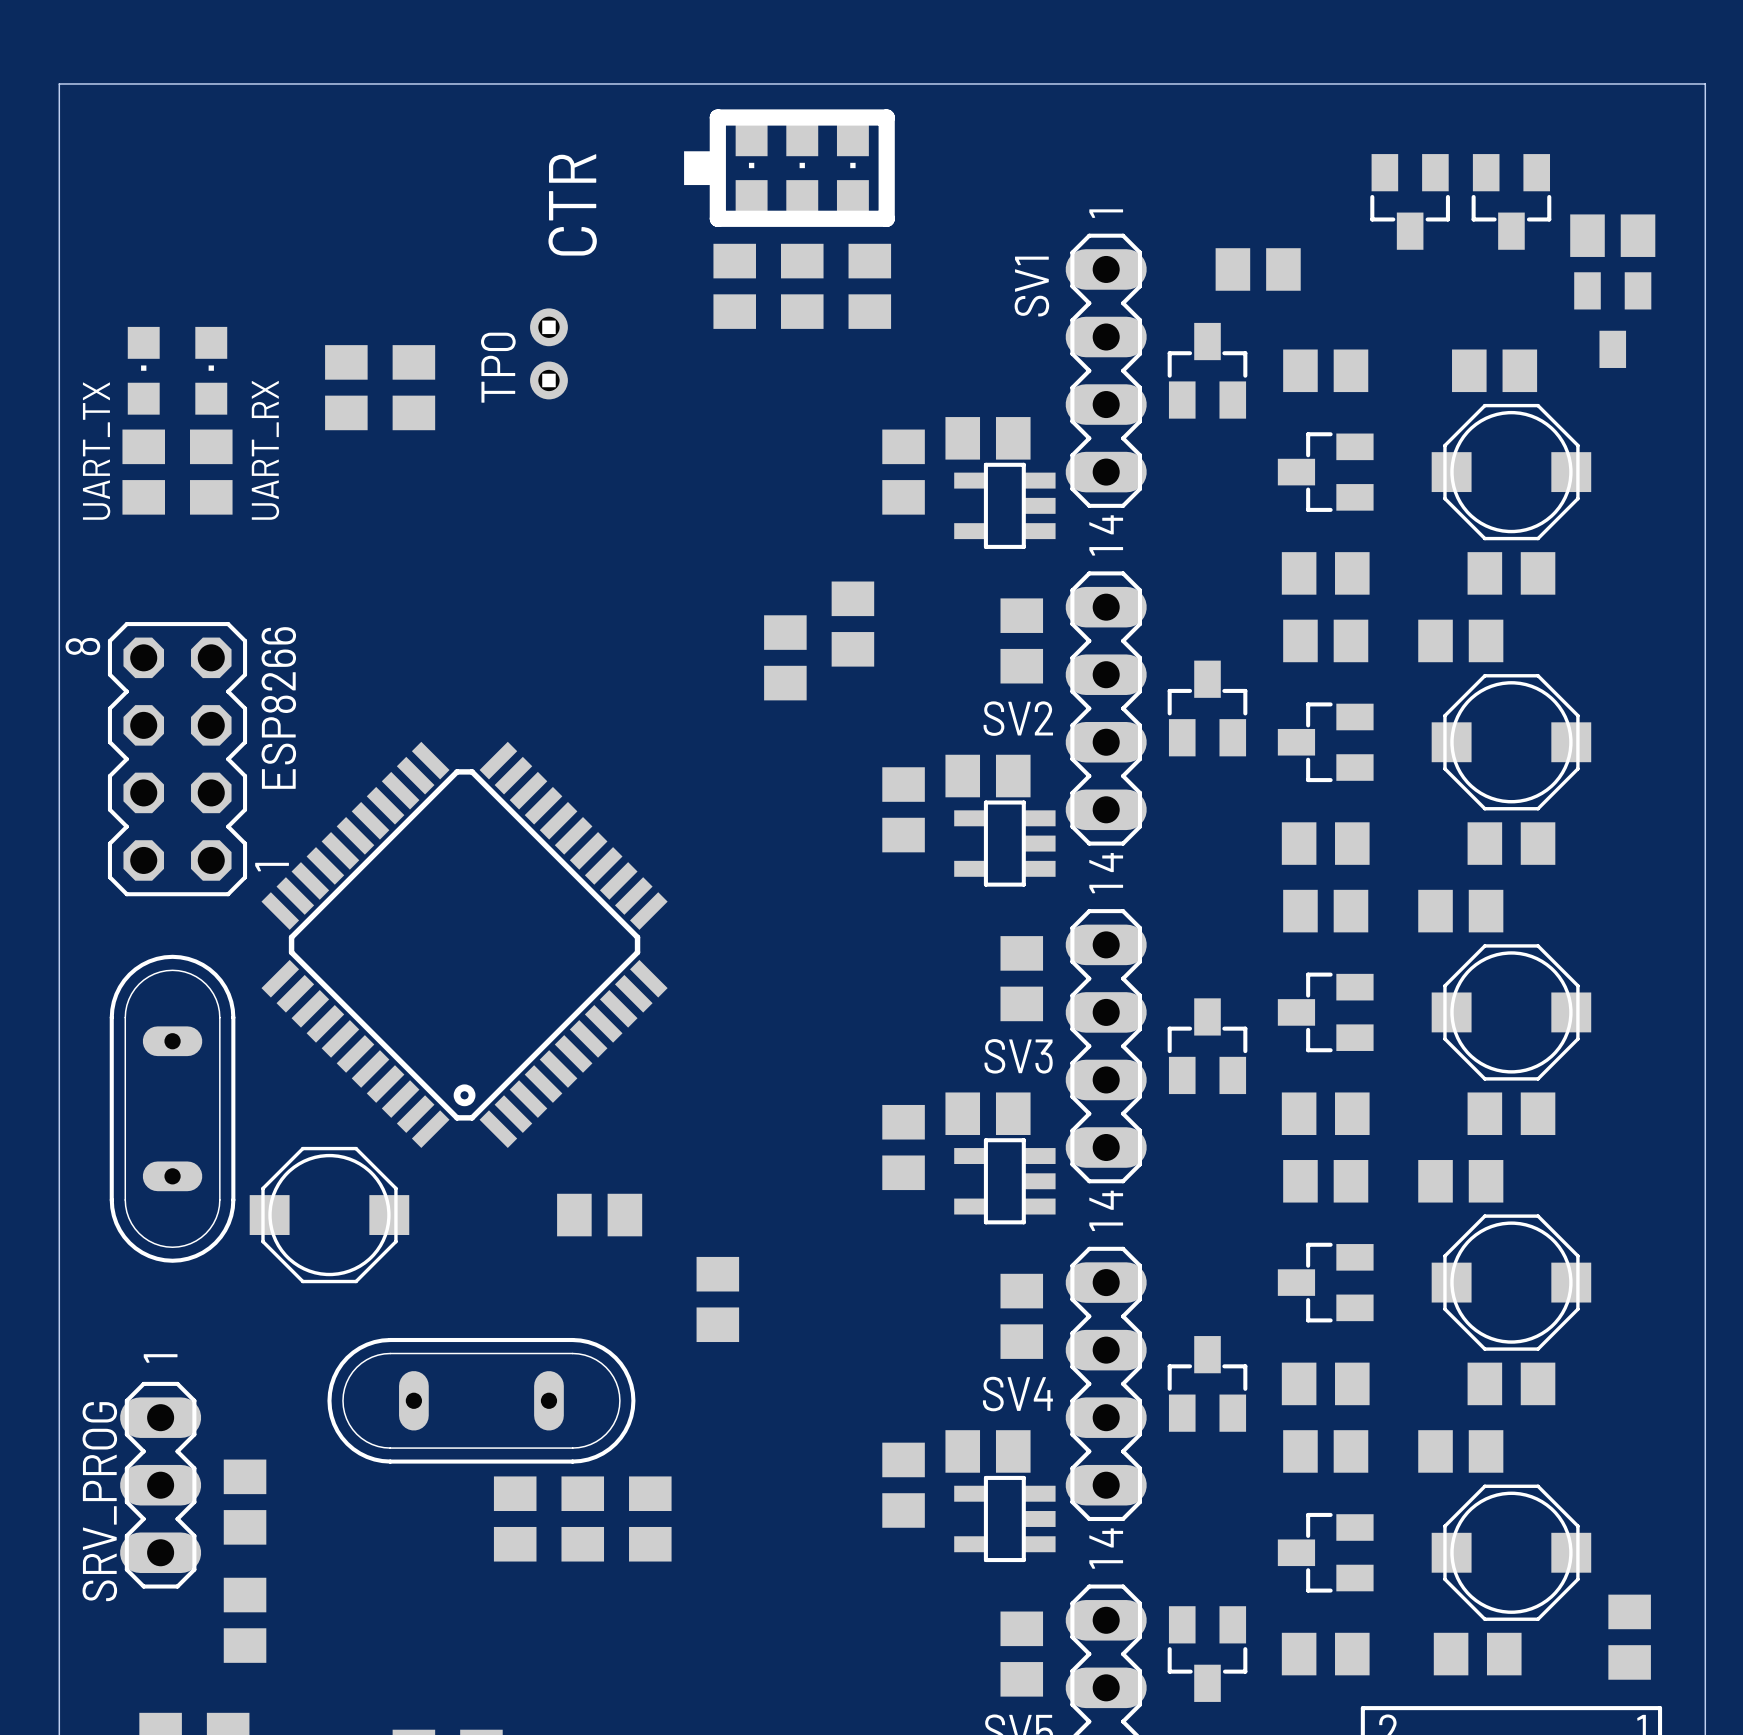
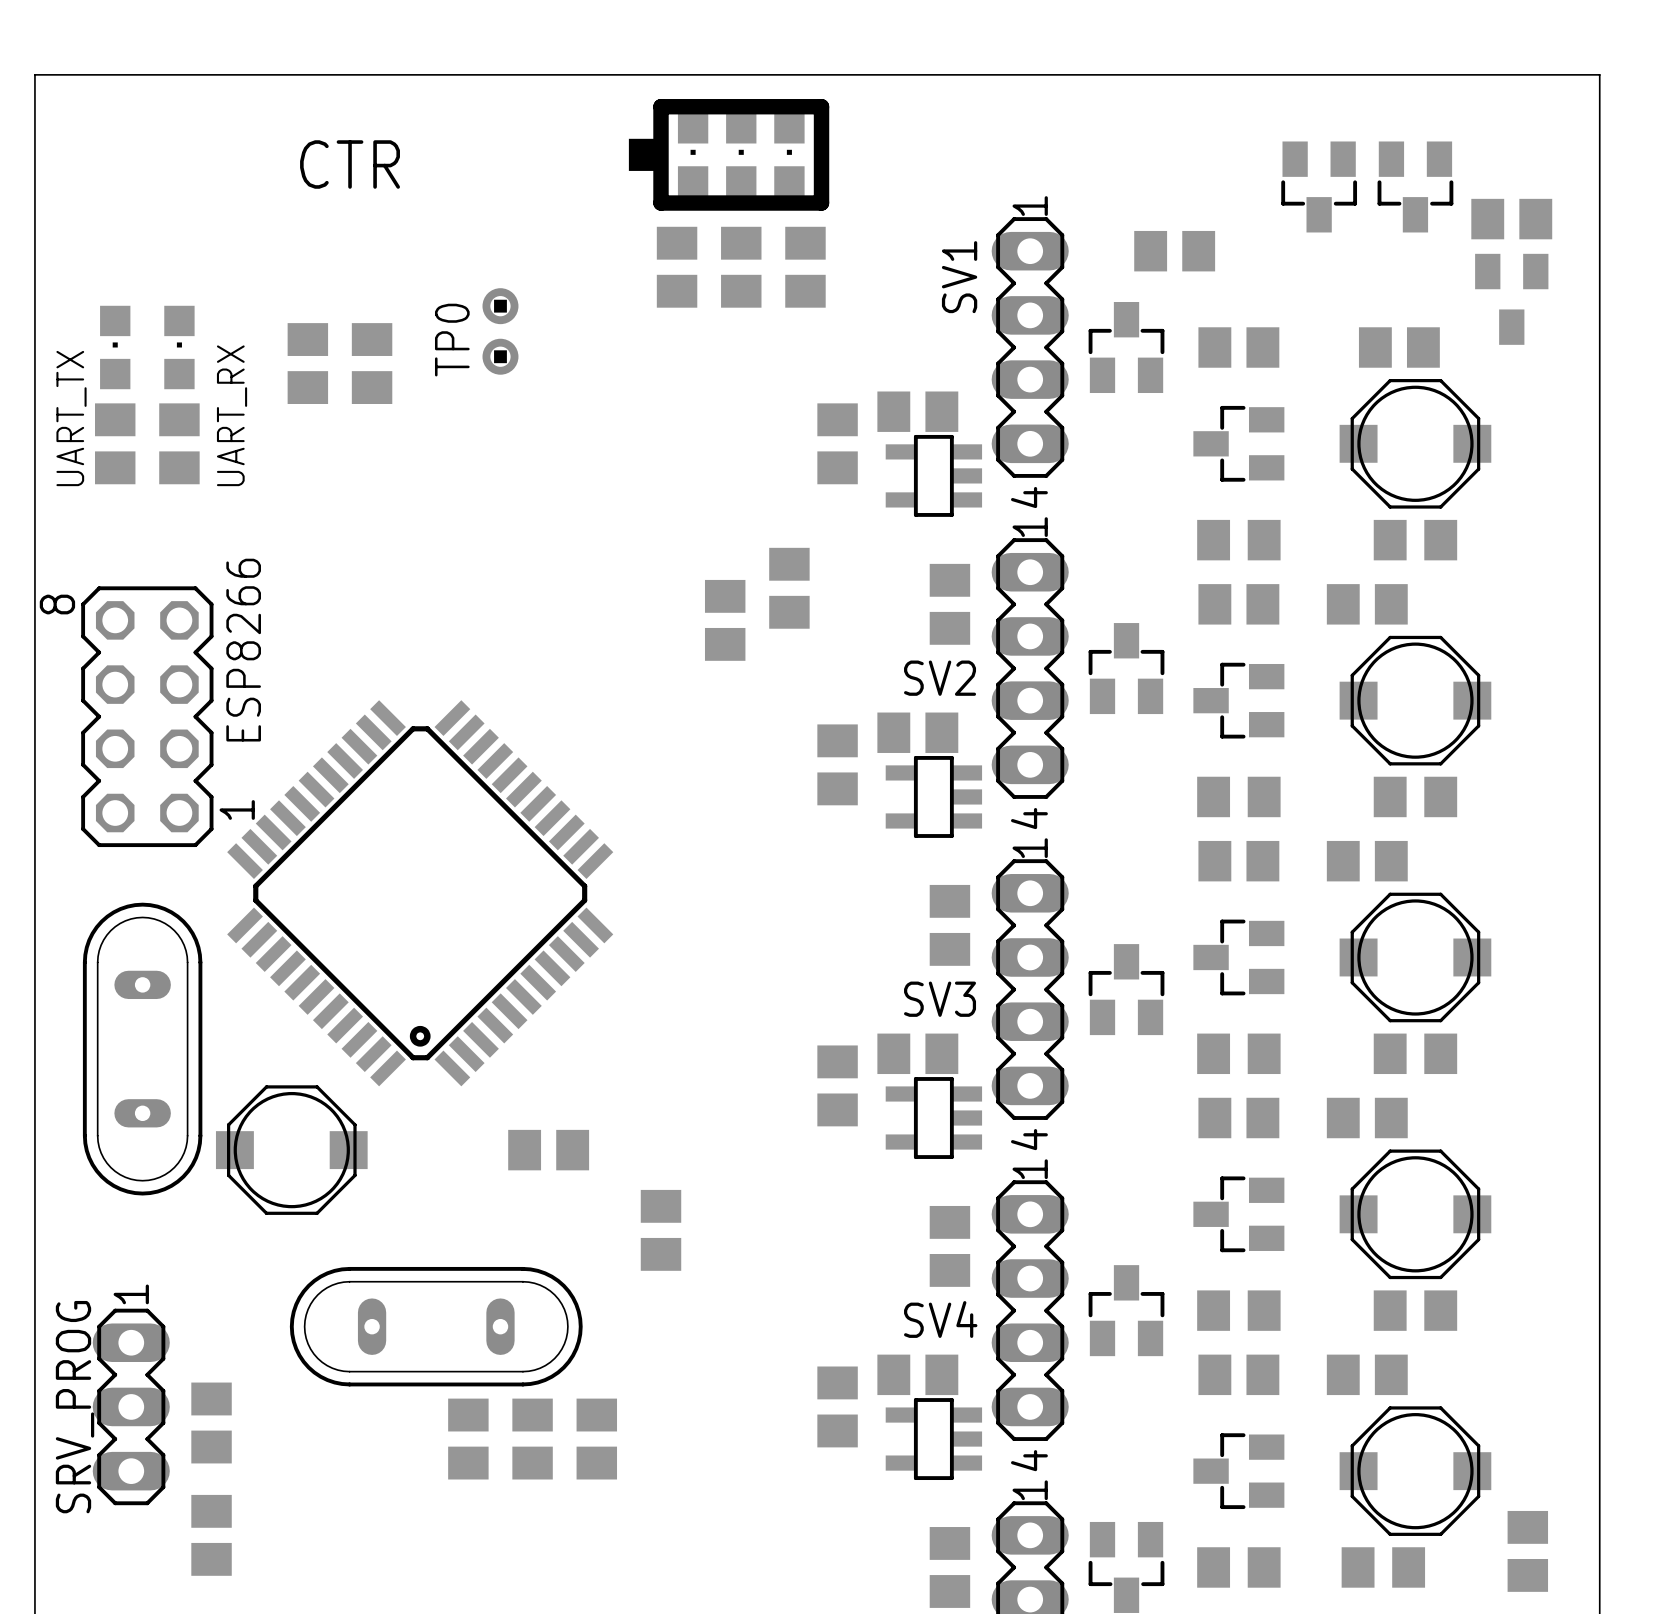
text rotation: 0° (572, 204) -> 90° clockwise (350, 164)
text position: CTR (572, 204) -> CTR (350, 164)

